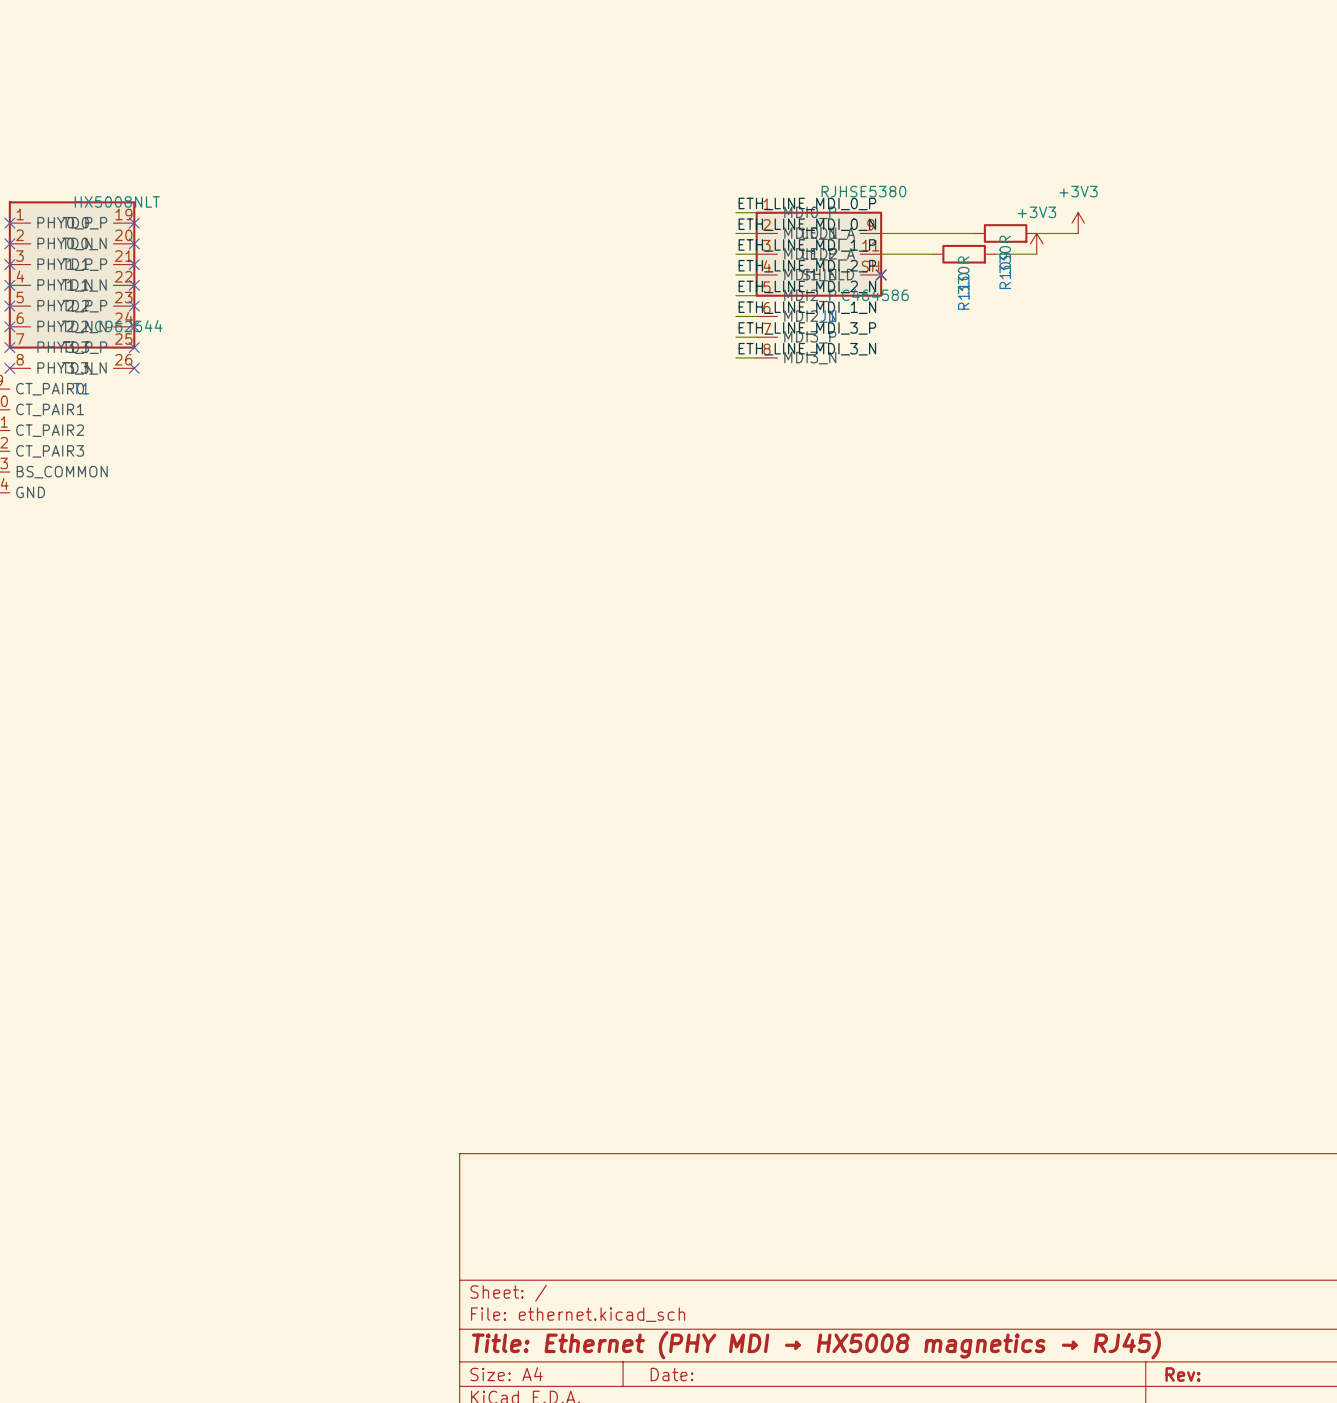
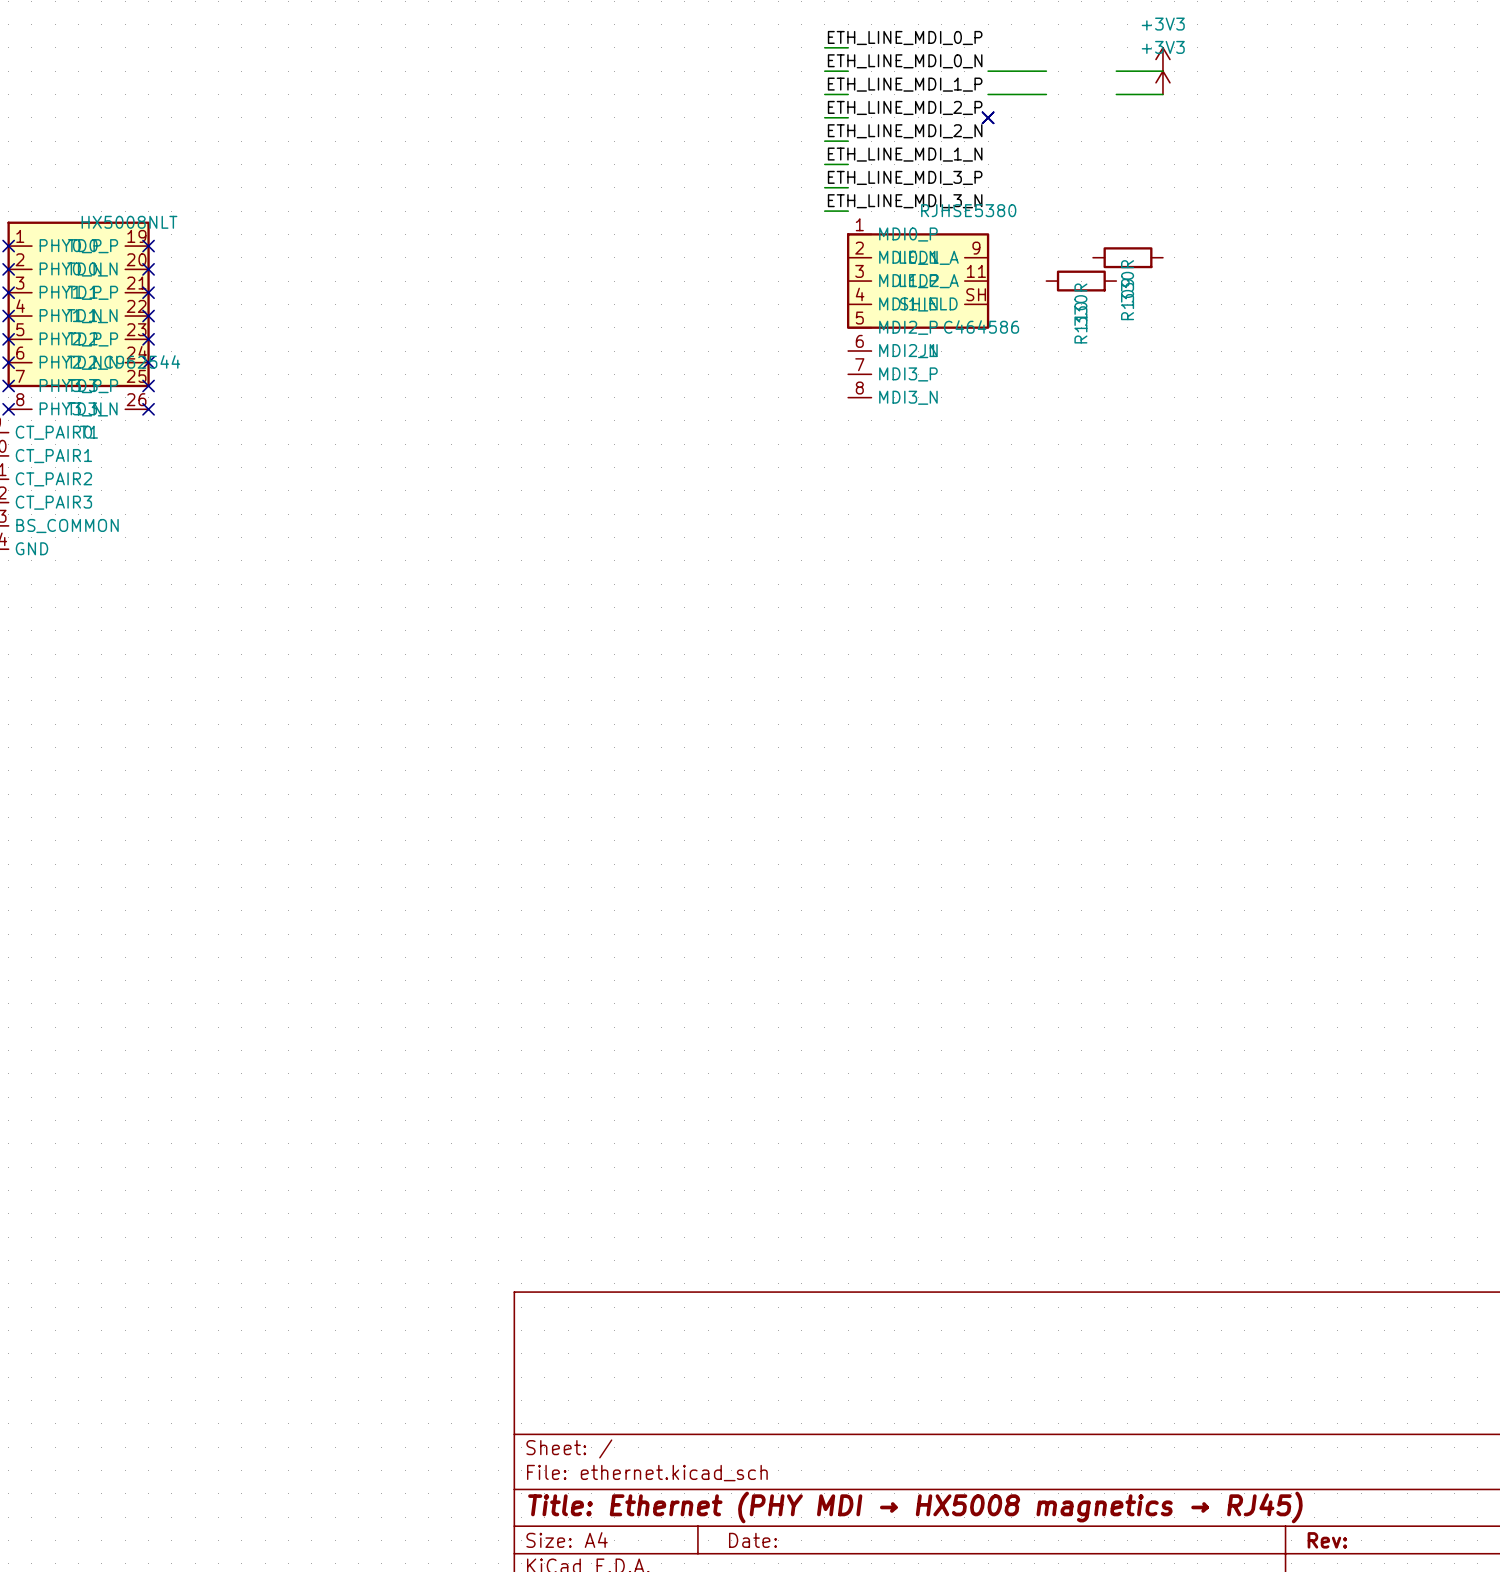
power symbol: none -> +3V3 (1162, 59)
wire: none -> (988, 71) (1046, 71)
power symbol: none -> +3V3 (1162, 82)
no-connect mark: none -> (988, 117)
label position: ETH_LINE_MDI_0_P (807, 203) -> ETH_LINE_MDI_0_P (905, 37)
wire: (735, 212) (756, 212) -> (824, 47) (848, 47)
power symbol: +3V3 (1078, 223) -> none
label position: ETH_LINE_MDI_0_N (807, 224) -> ETH_LINE_MDI_0_N (905, 61)
wire: (735, 233) (756, 233) -> (824, 71) (848, 71)
wire: (881, 233) (974, 233) -> none
wire: (1036, 233) (1078, 233) -> (1116, 71) (1162, 71)
power symbol: +3V3 (1036, 243) -> none
label position: ETH_LINE_MDI_1_P (807, 245) -> ETH_LINE_MDI_1_P (905, 84)
wire: (735, 254) (756, 254) -> (824, 94) (848, 94)
wire: (881, 254) (933, 254) -> (988, 94) (1046, 94)
wire: (995, 254) (1036, 254) -> (1116, 94) (1162, 94)
label position: ETH_LINE_MDI_2_P (807, 266) -> ETH_LINE_MDI_2_P (905, 107)
wire: (735, 274) (756, 274) -> (824, 117) (848, 117)
no-connect mark: (881, 274) -> none
label position: ETH_LINE_MDI_2_N (807, 286) -> ETH_LINE_MDI_2_N (905, 131)
wire: (735, 295) (756, 295) -> (824, 141) (848, 141)
label position: ETH_LINE_MDI_1_N (807, 307) -> ETH_LINE_MDI_1_N (905, 154)
wire: (735, 316) (756, 316) -> (824, 164) (848, 164)
label position: ETH_LINE_MDI_3_P (807, 328) -> ETH_LINE_MDI_3_P (905, 177)
wire: (735, 337) (756, 337) -> (824, 187) (848, 187)
label position: ETH_LINE_MDI_3_N (807, 349) -> ETH_LINE_MDI_3_N (905, 201)
wire: (735, 357) (756, 357) -> (824, 211) (848, 211)

